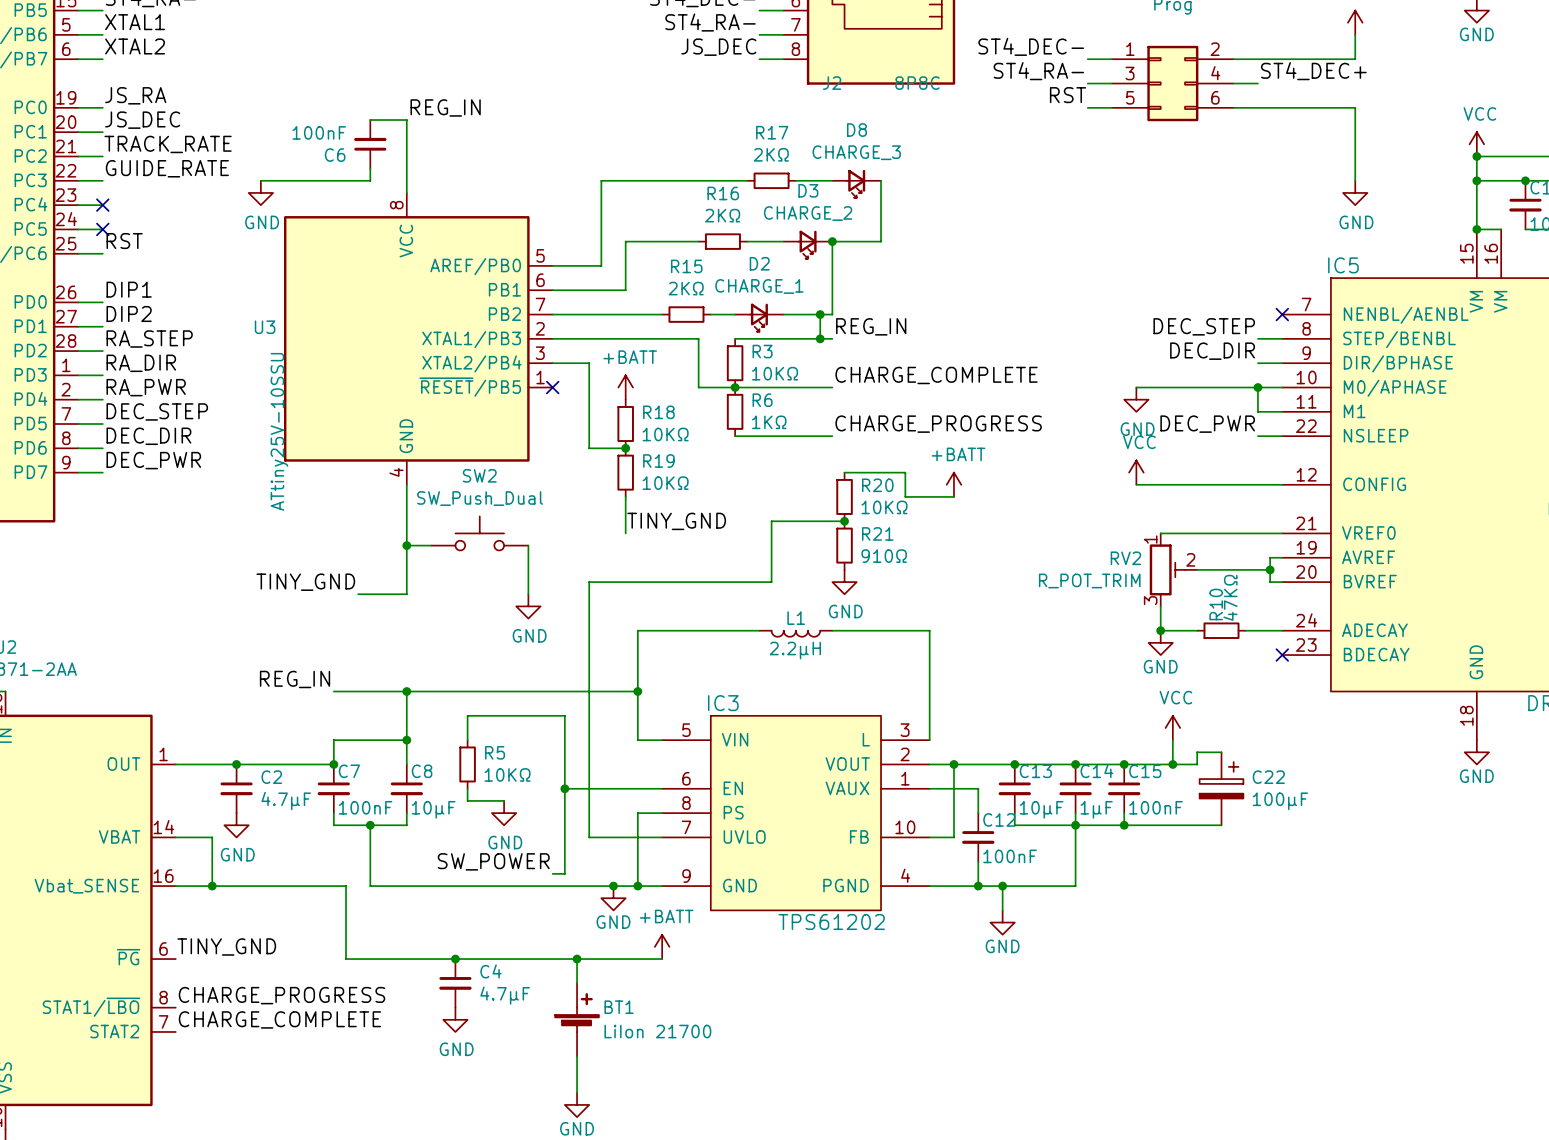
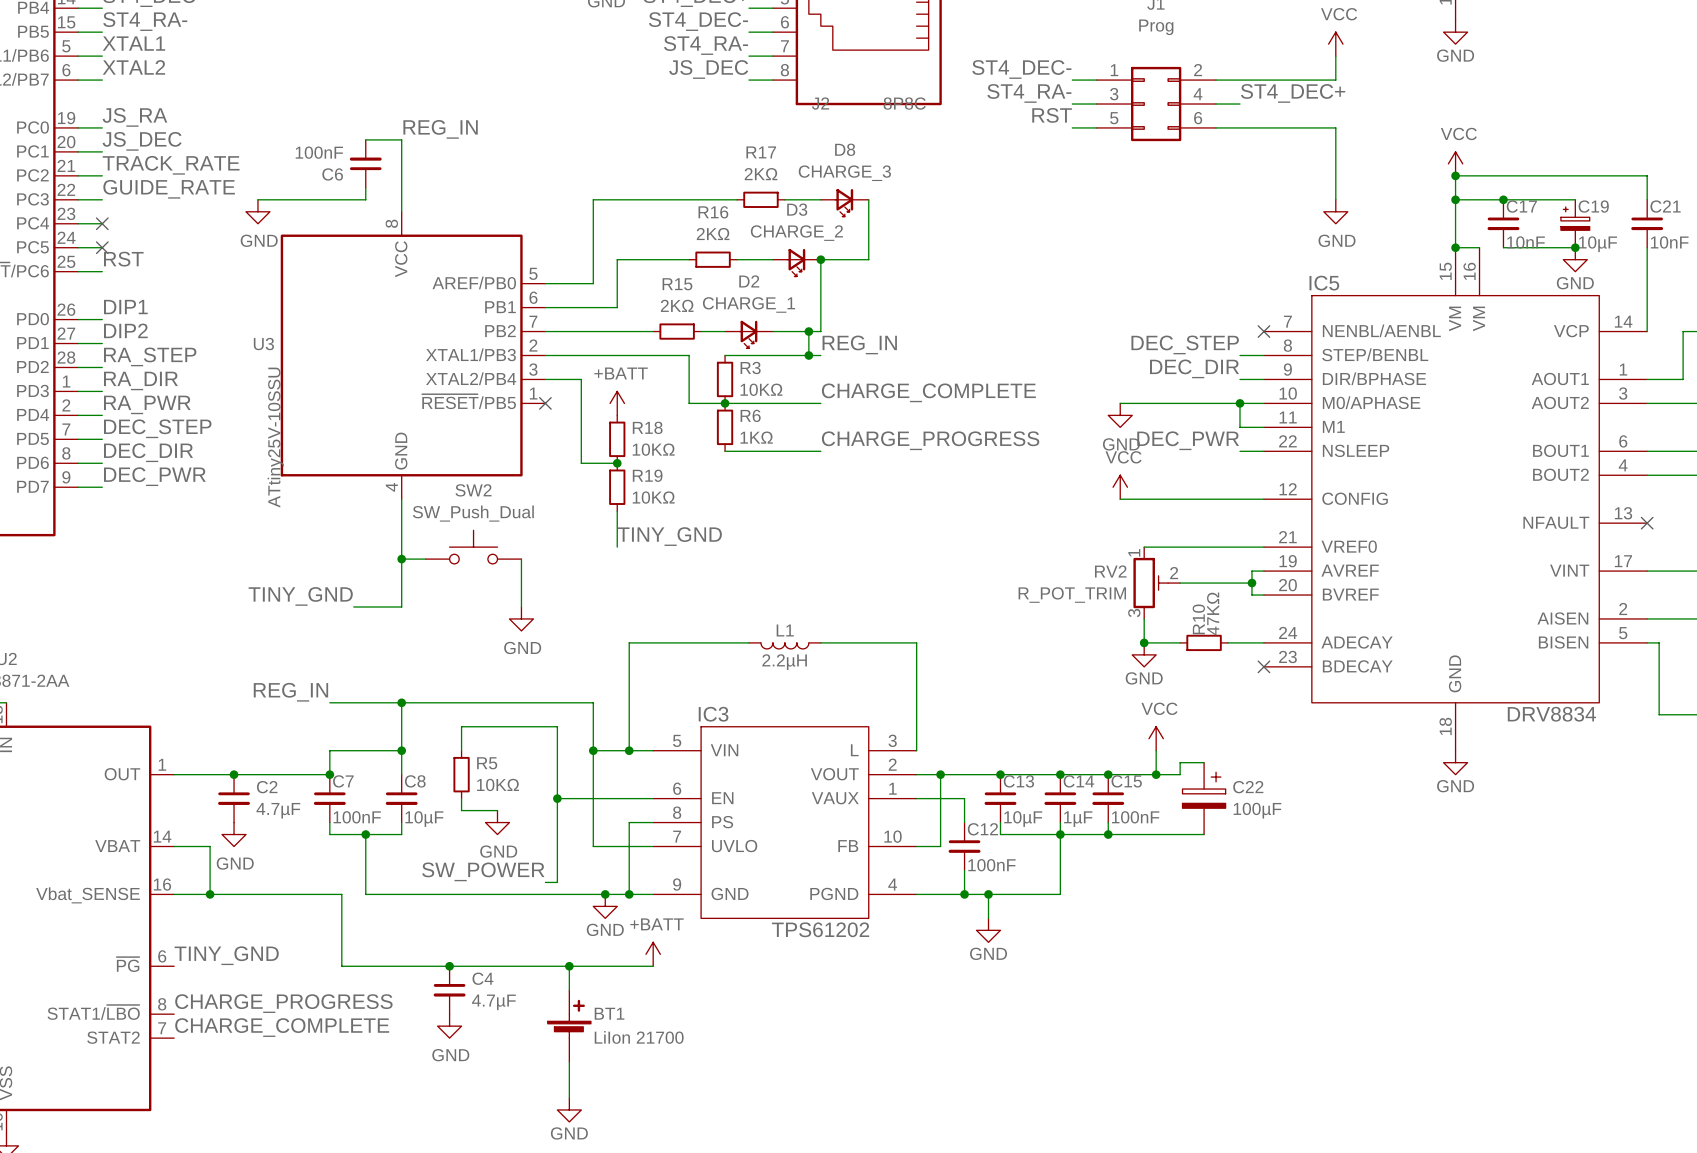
wire: (844, 472) (905, 472) (905, 496) (953, 496) -> none
power symbol: +BATT (953, 484) -> none
R20: 10KΩ (844, 496) -> none
wire: (844, 521) (771, 521) (771, 582) (589, 582) (589, 837) (601, 837) -> none
junction: (844, 521) -> none
R21: 910Ω (844, 545) -> none
power symbol: GND (844, 582) -> none
wire: (601, 691) (637, 691) -> (593, 702) (593, 846)
junction: (637, 691) -> none
wire: none -> (593, 750) (629, 750)
junction: none -> (593, 750)
junction: none -> (629, 750)

